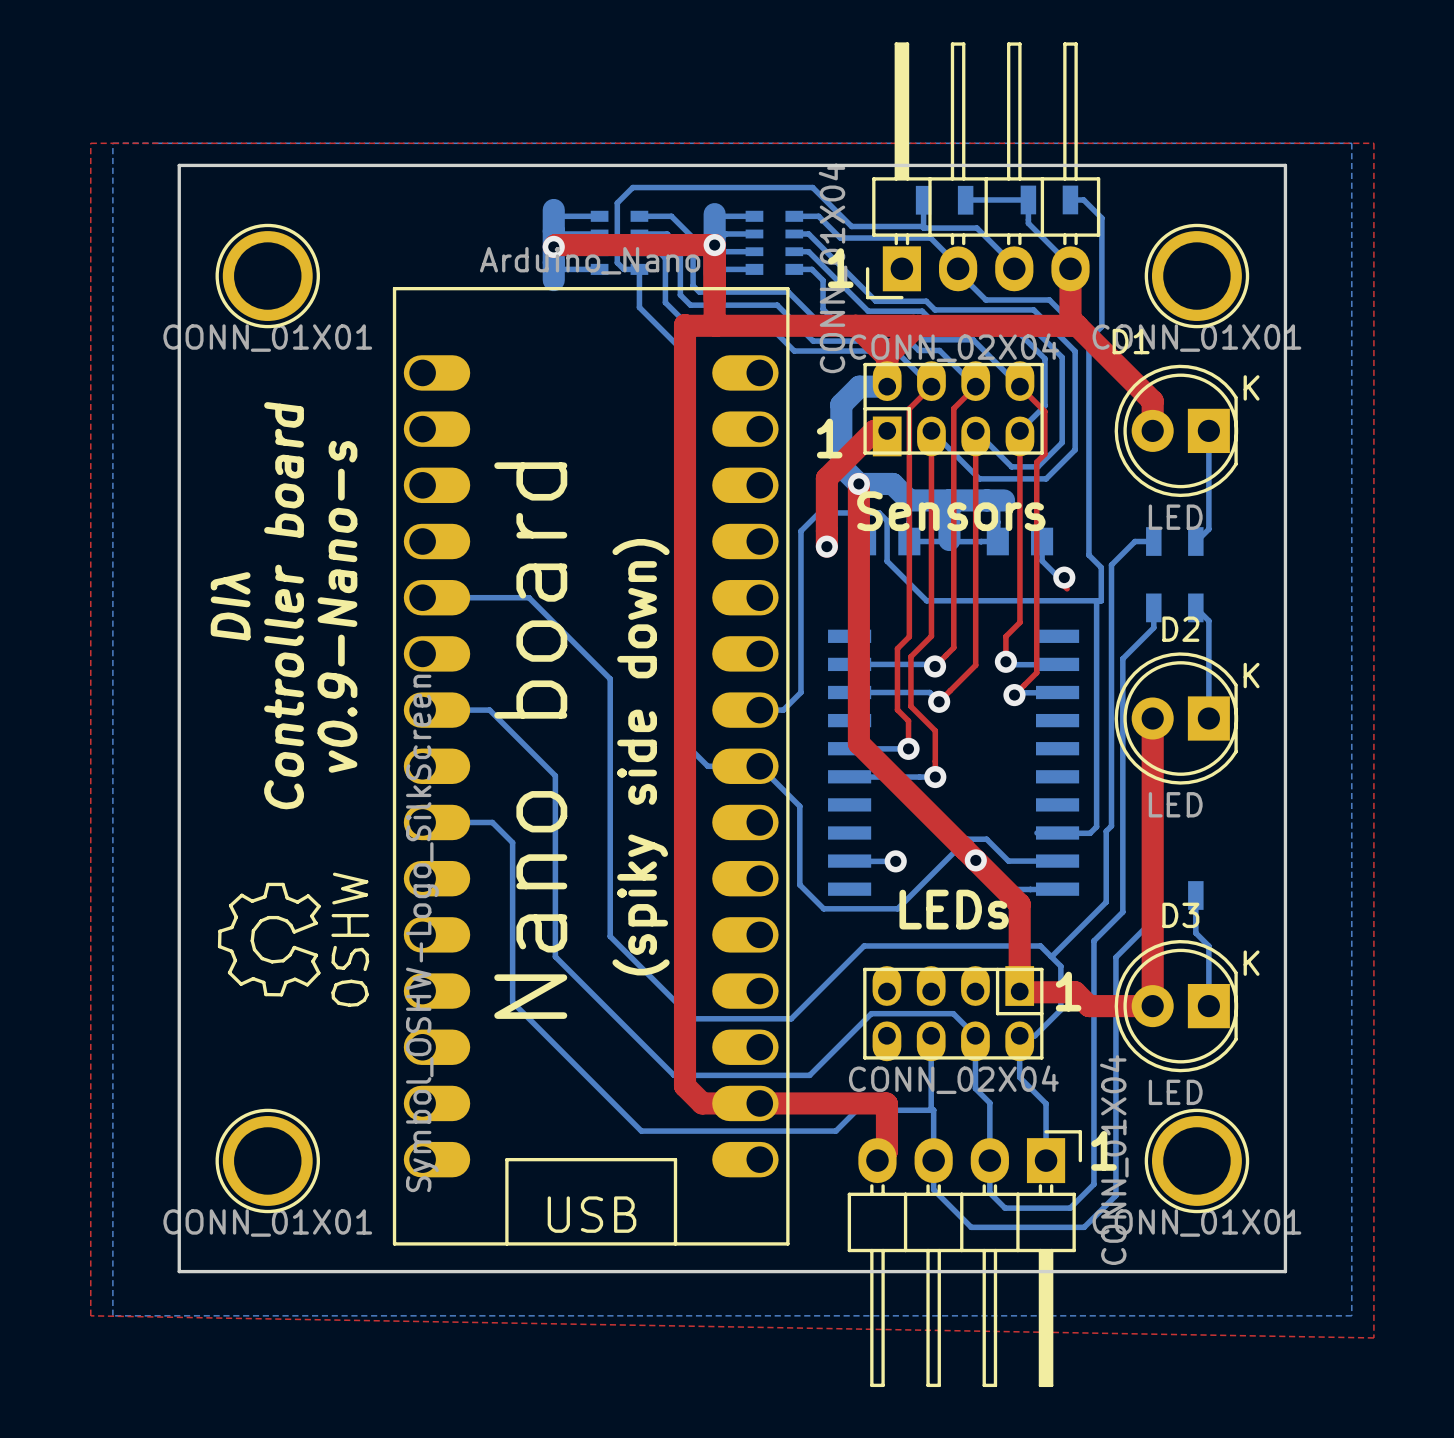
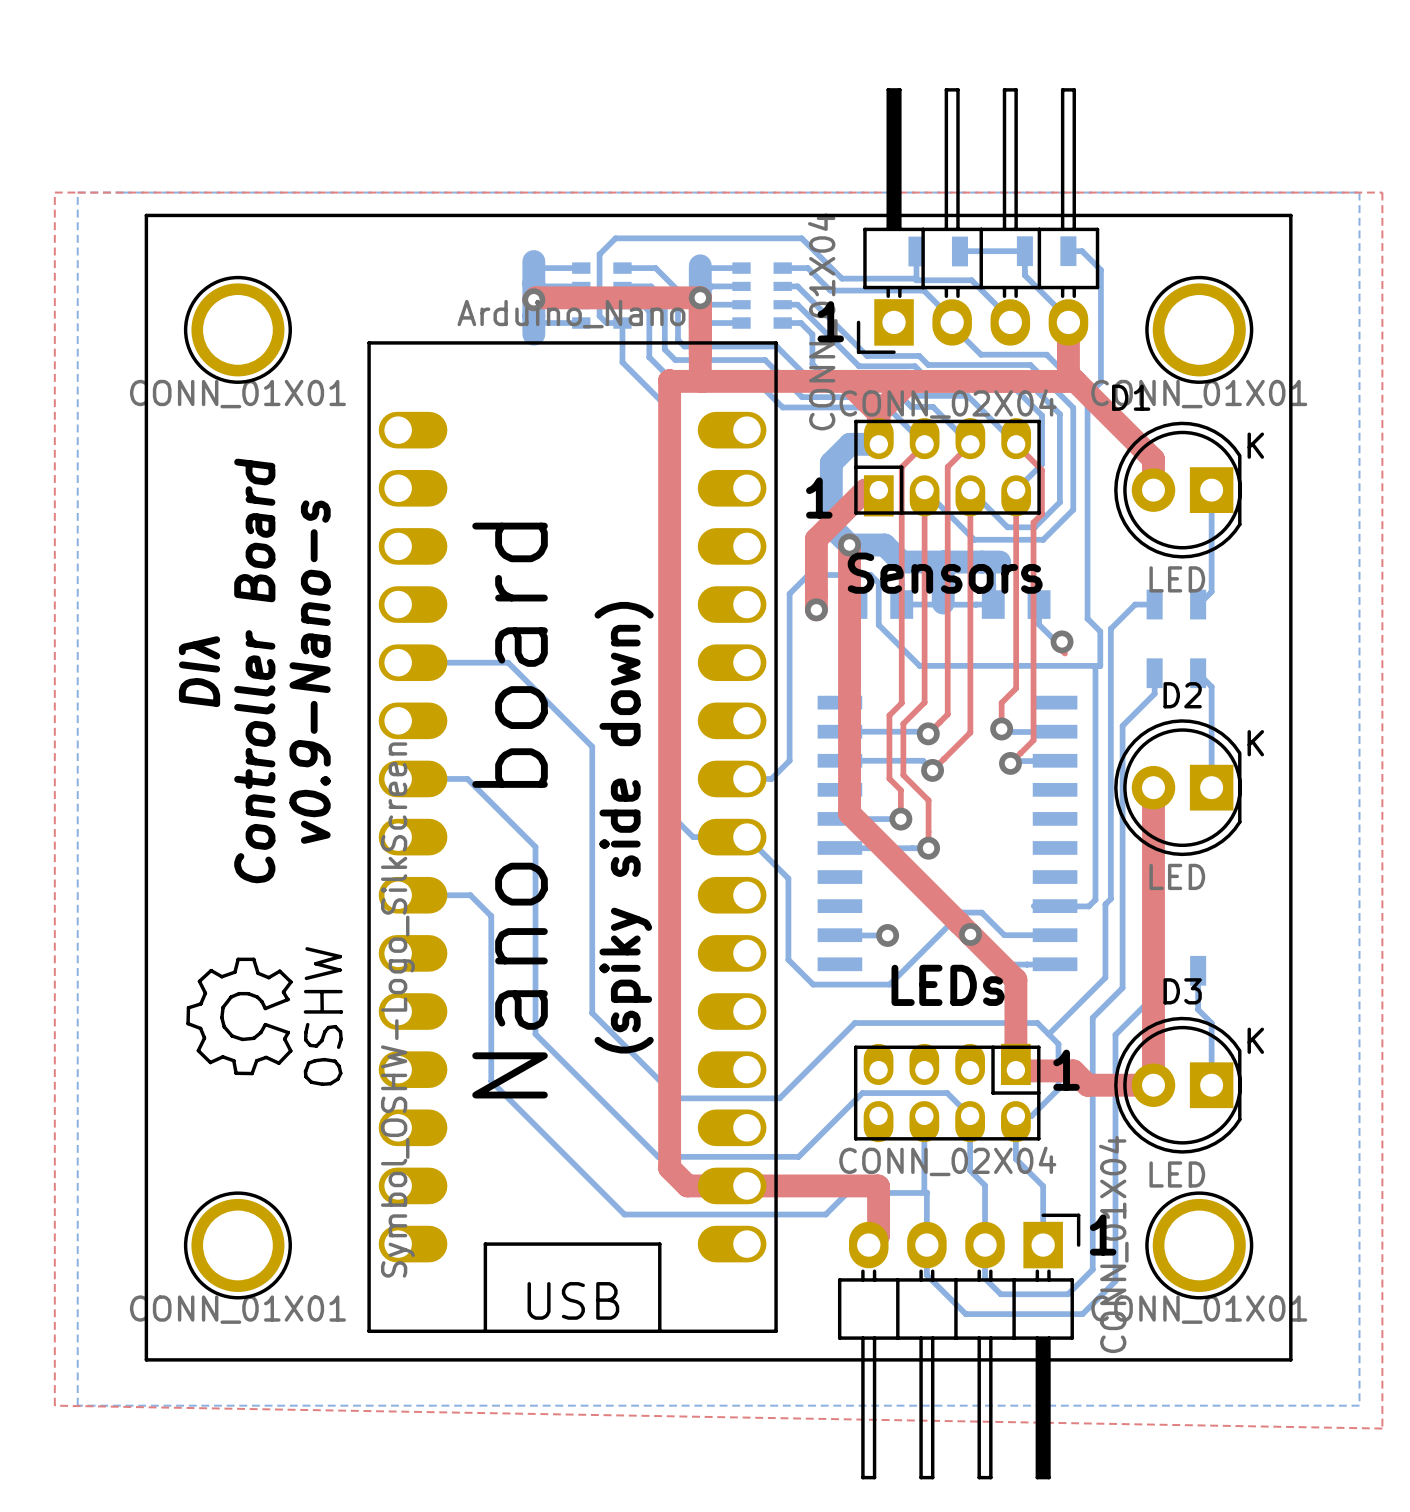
text: Controller board (284, 605) -> Controller Board (254, 670)

